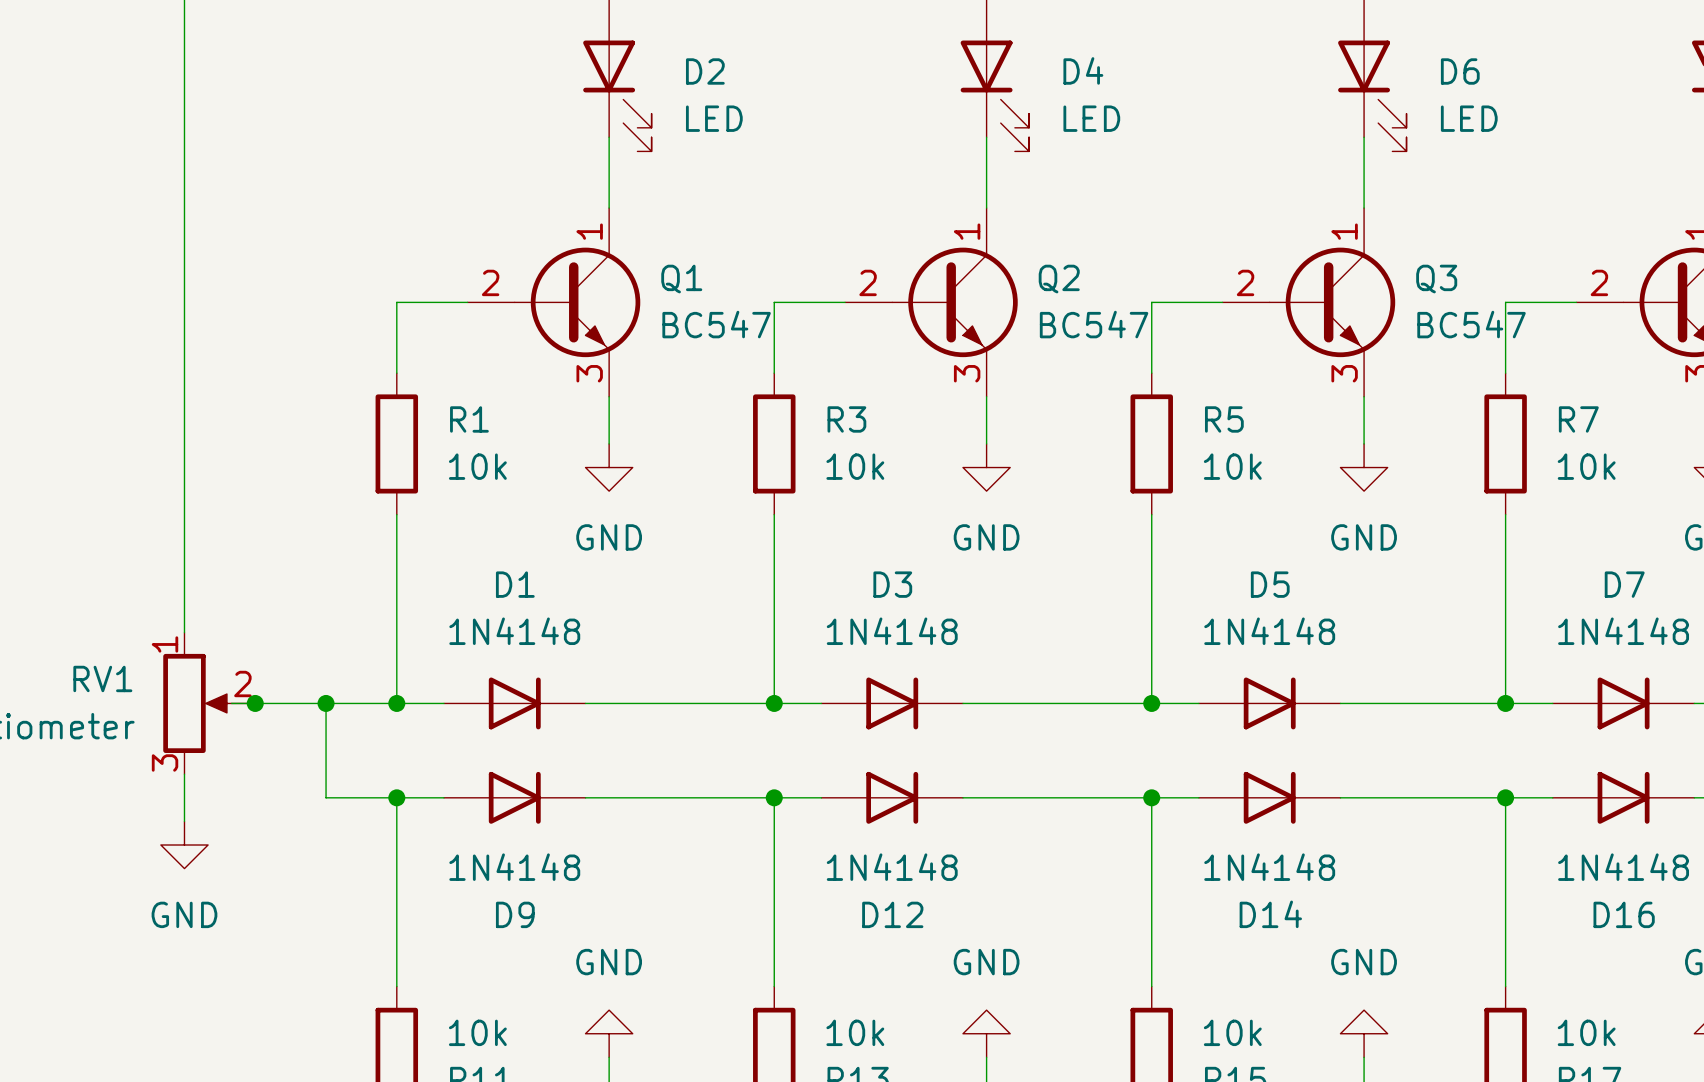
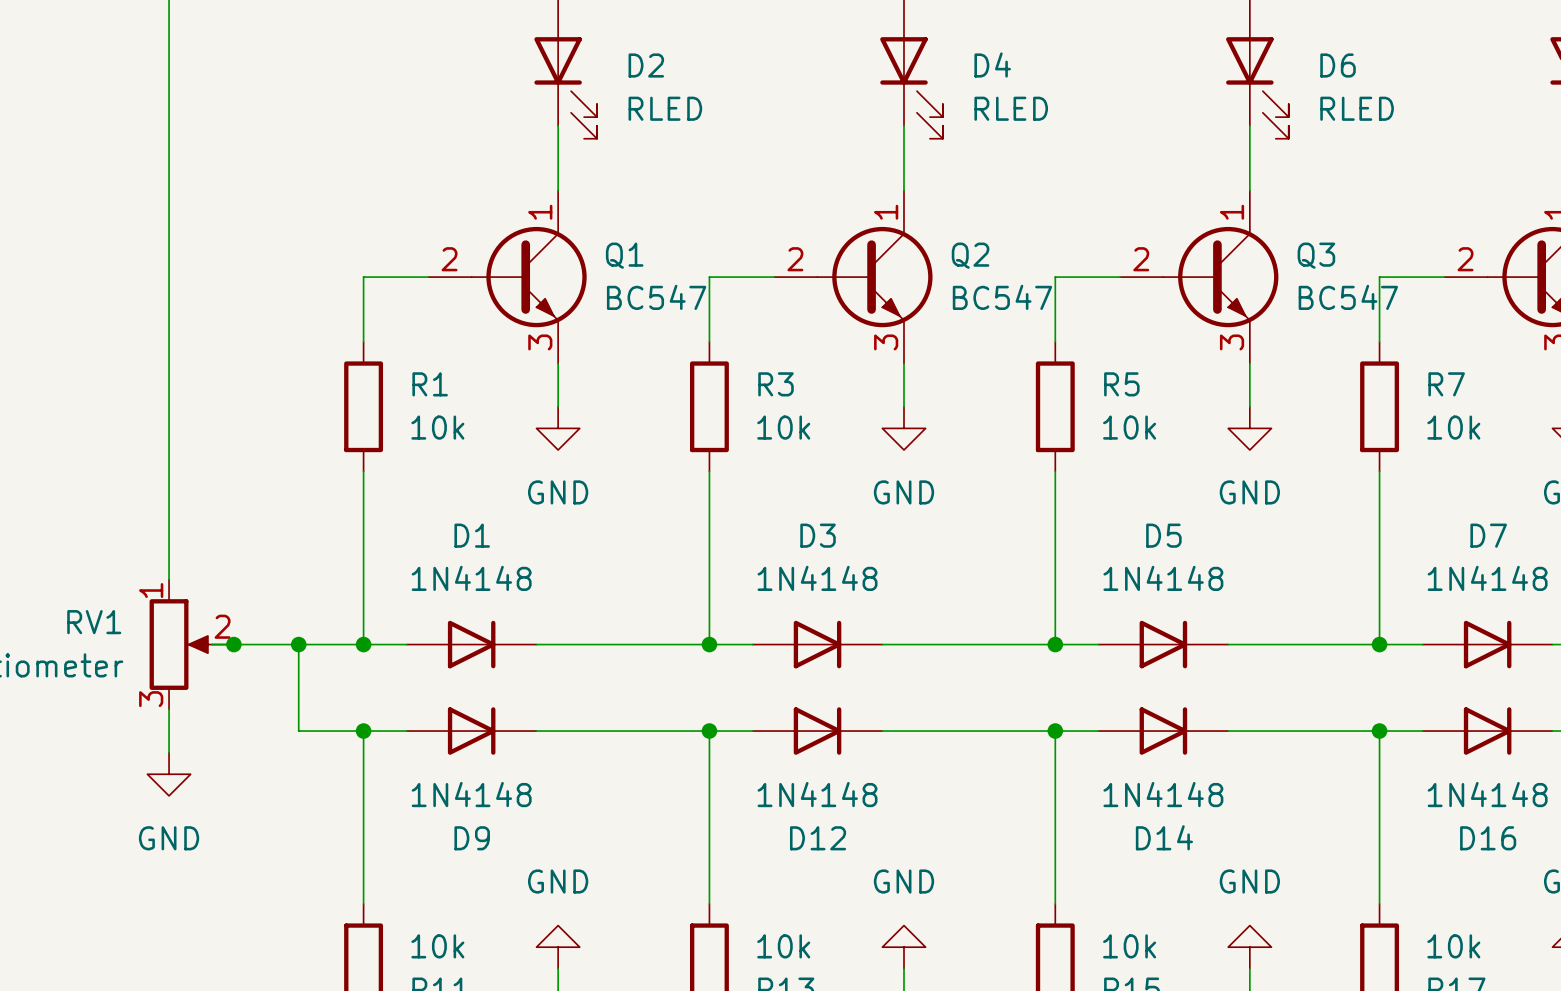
D2 value: LED (714, 118) -> RLED (665, 108)
D4 value: LED (1091, 118) -> RLED (1011, 108)
D6 value: LED (1469, 118) -> RLED (1357, 108)

